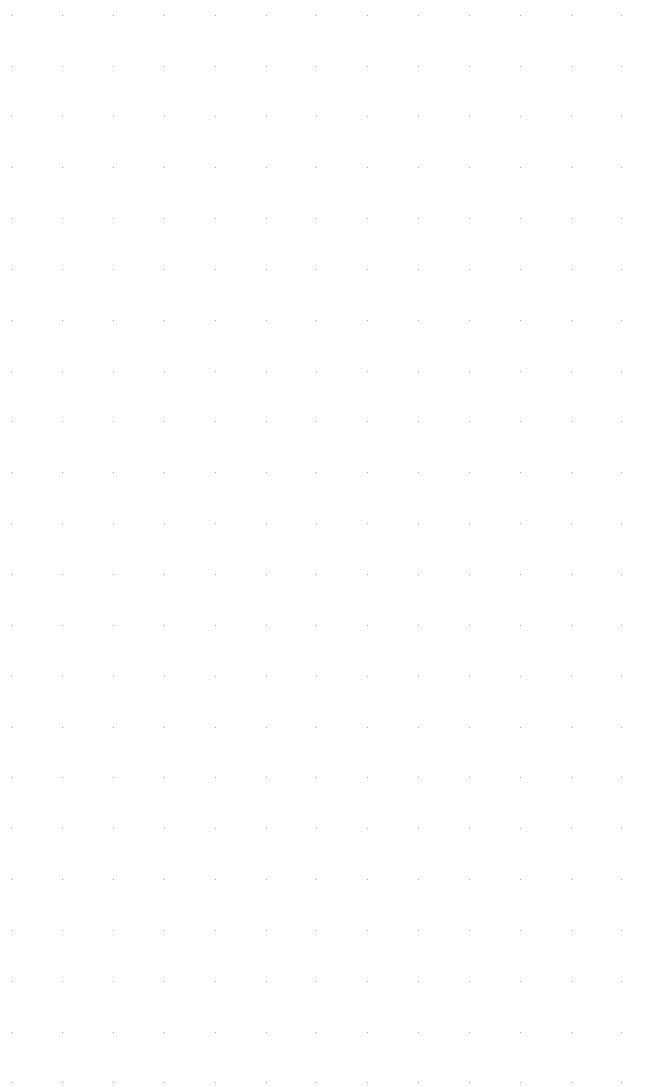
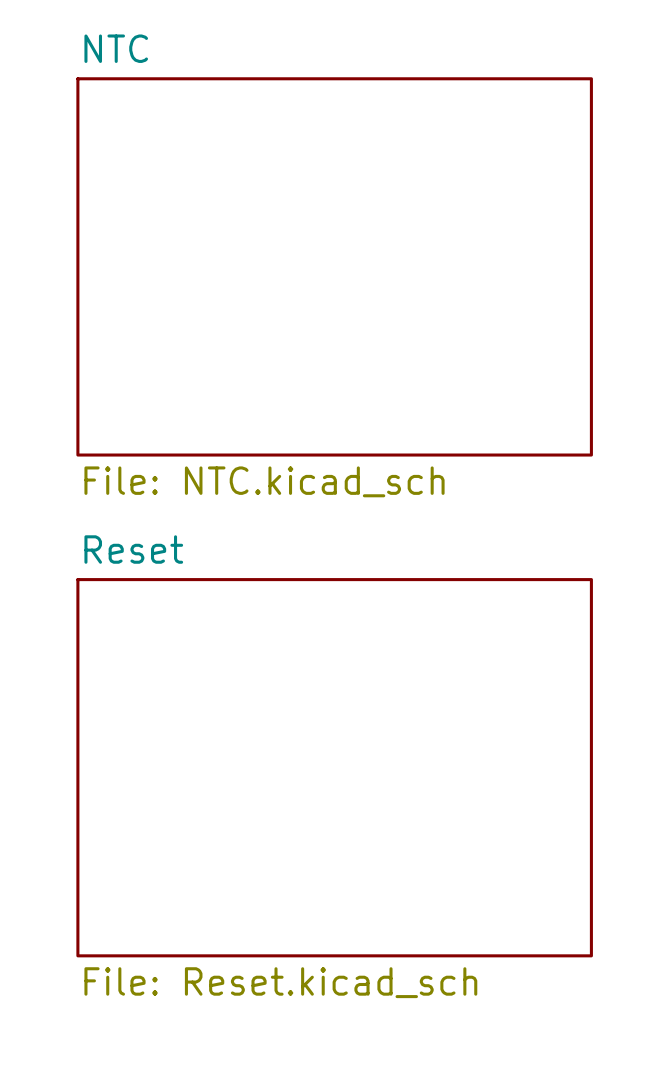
sheet NTC: none -> File: NTC.kicad_sch (334, 266)
sheet Reset: none -> File: Reset.kicad_sch (334, 767)

